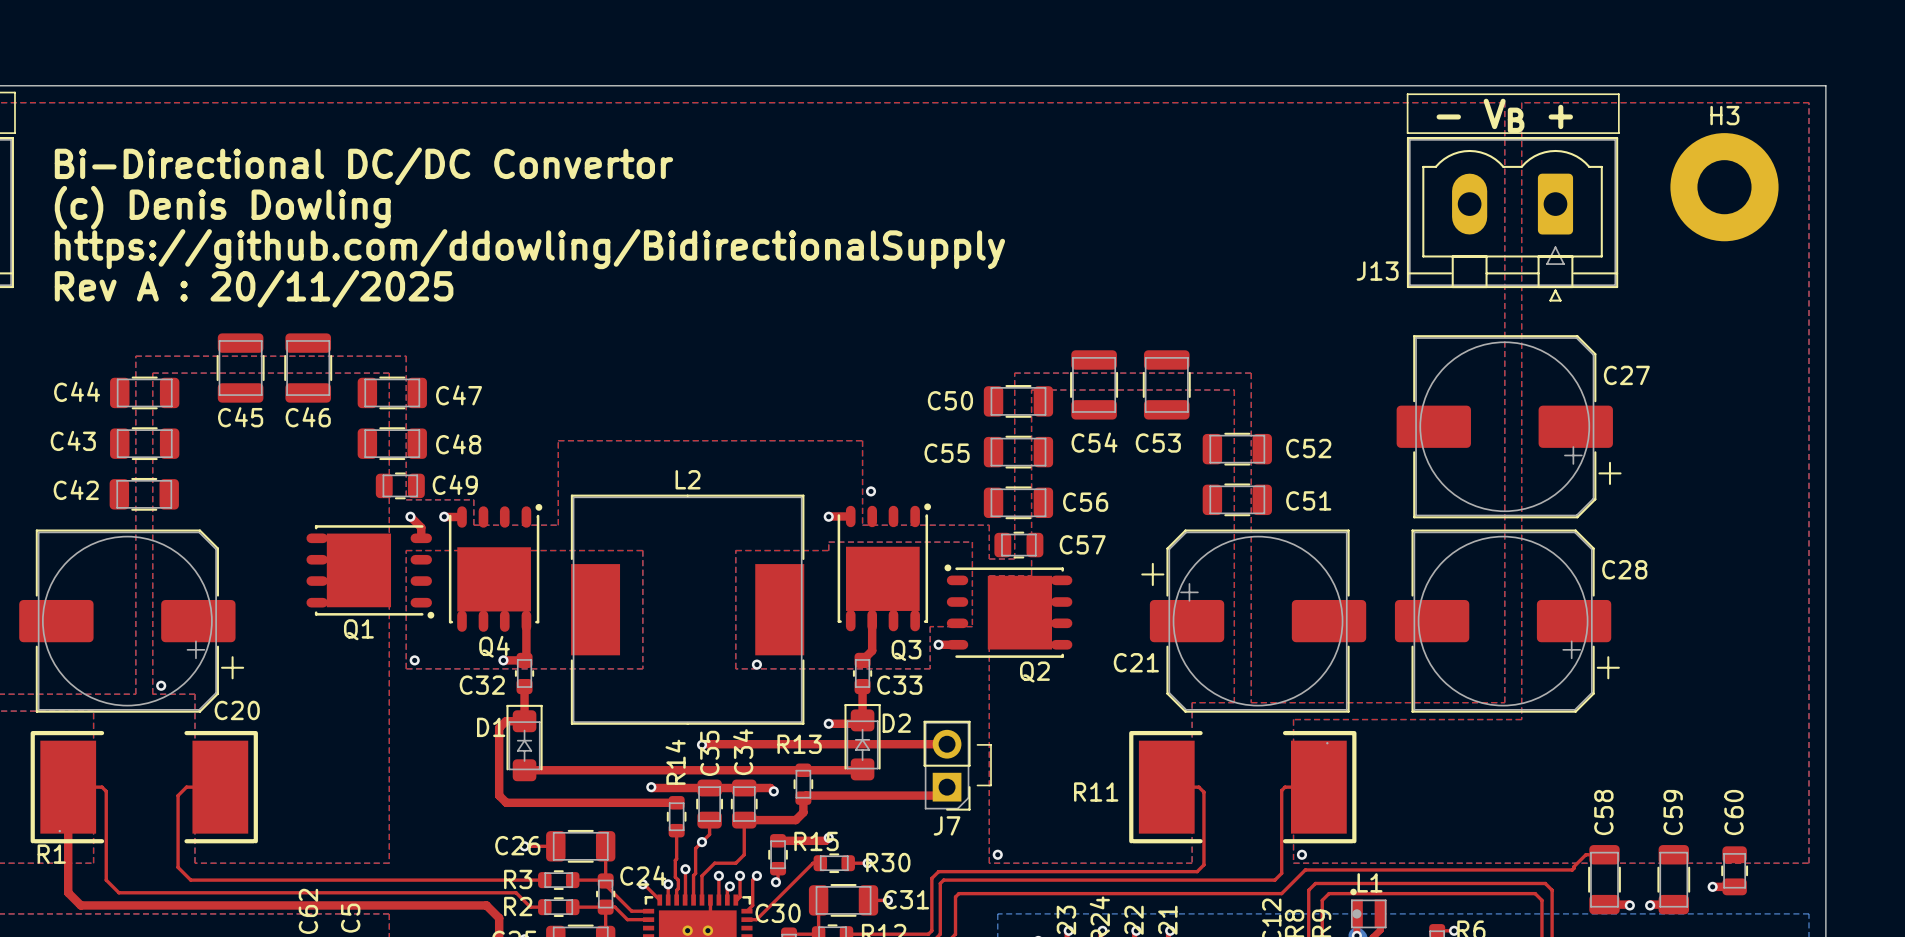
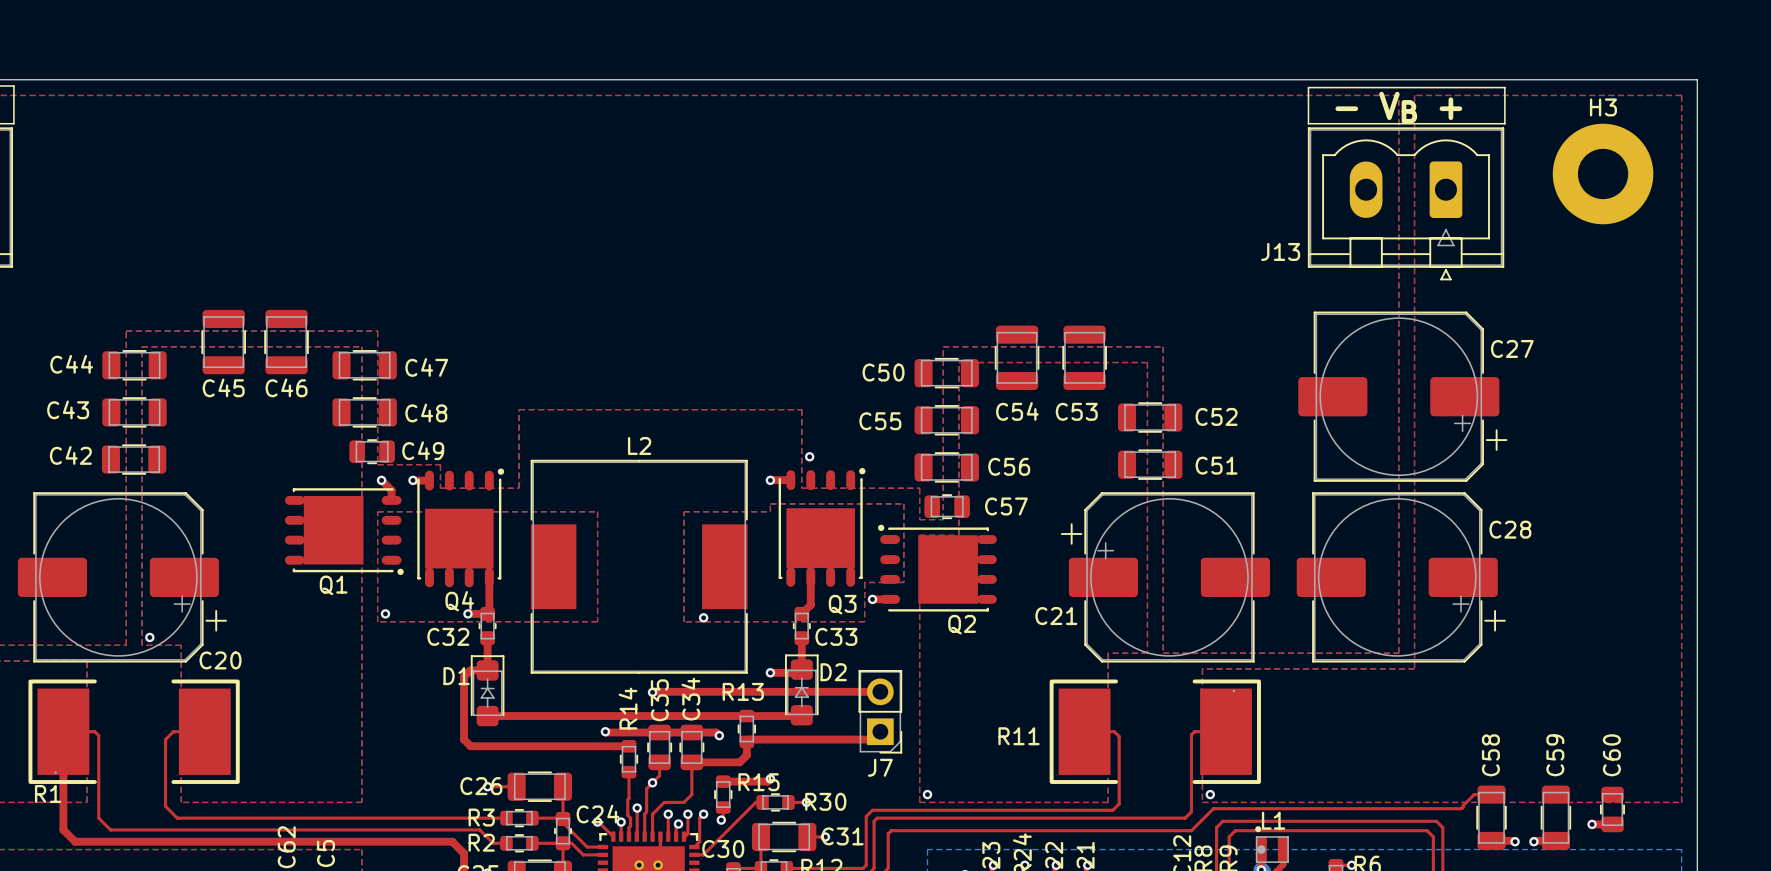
text: Bi-Directional DC/DC Convertor (363, 166) -> none
text: (c) Denis Dowling (222, 207) -> none
text: https://github.com/ddowling/BidirectionalSupply (529, 249) -> none
text: Rev A : 20/11/2025 (254, 288) -> none
line: (977, 744) (991, 744) (991, 785) (977, 785) -> none

